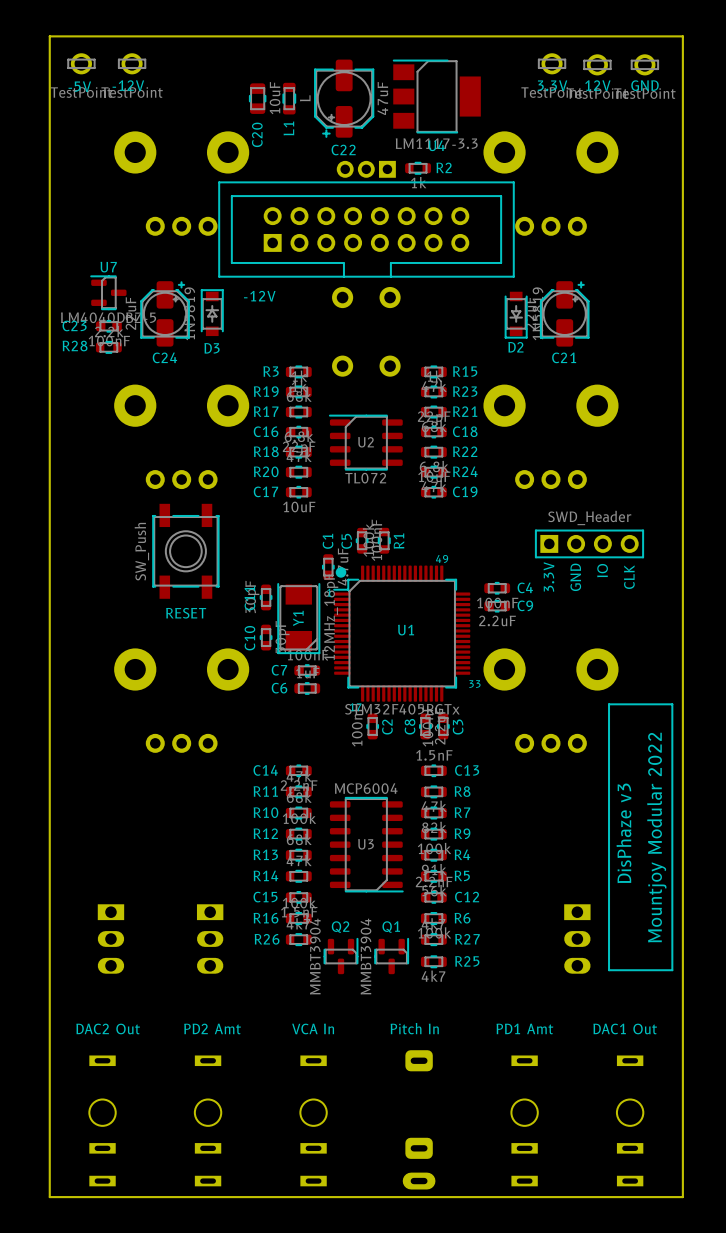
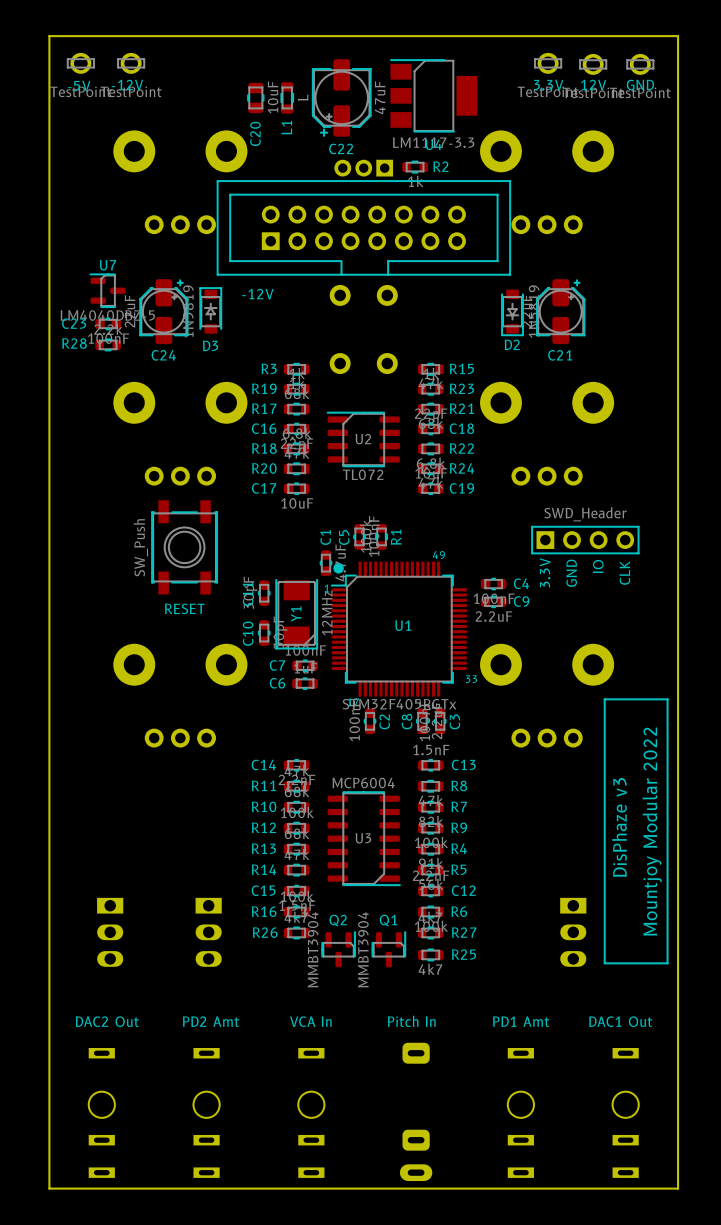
Y1 value: 12MHz_18pF (331, 617) -> 12MHz (327, 613)

